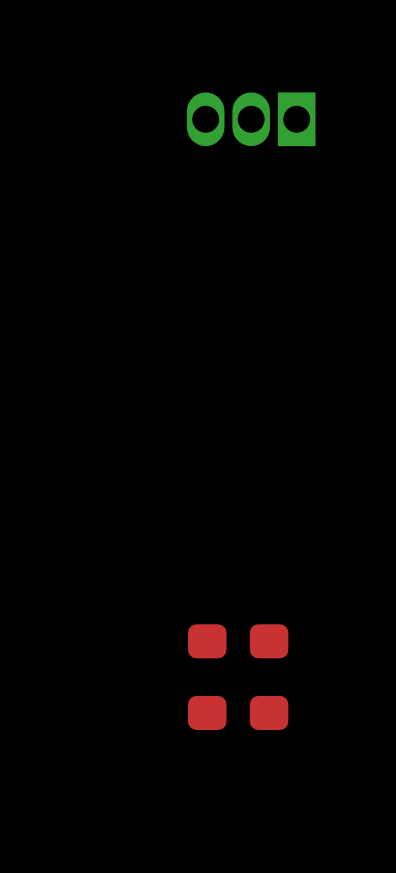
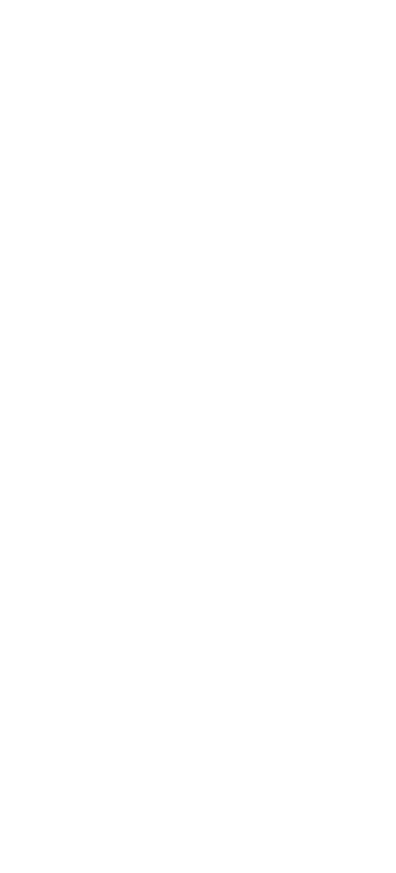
part: (251, 119) -> none
part: (238, 641) -> none
part: (238, 712) -> none

